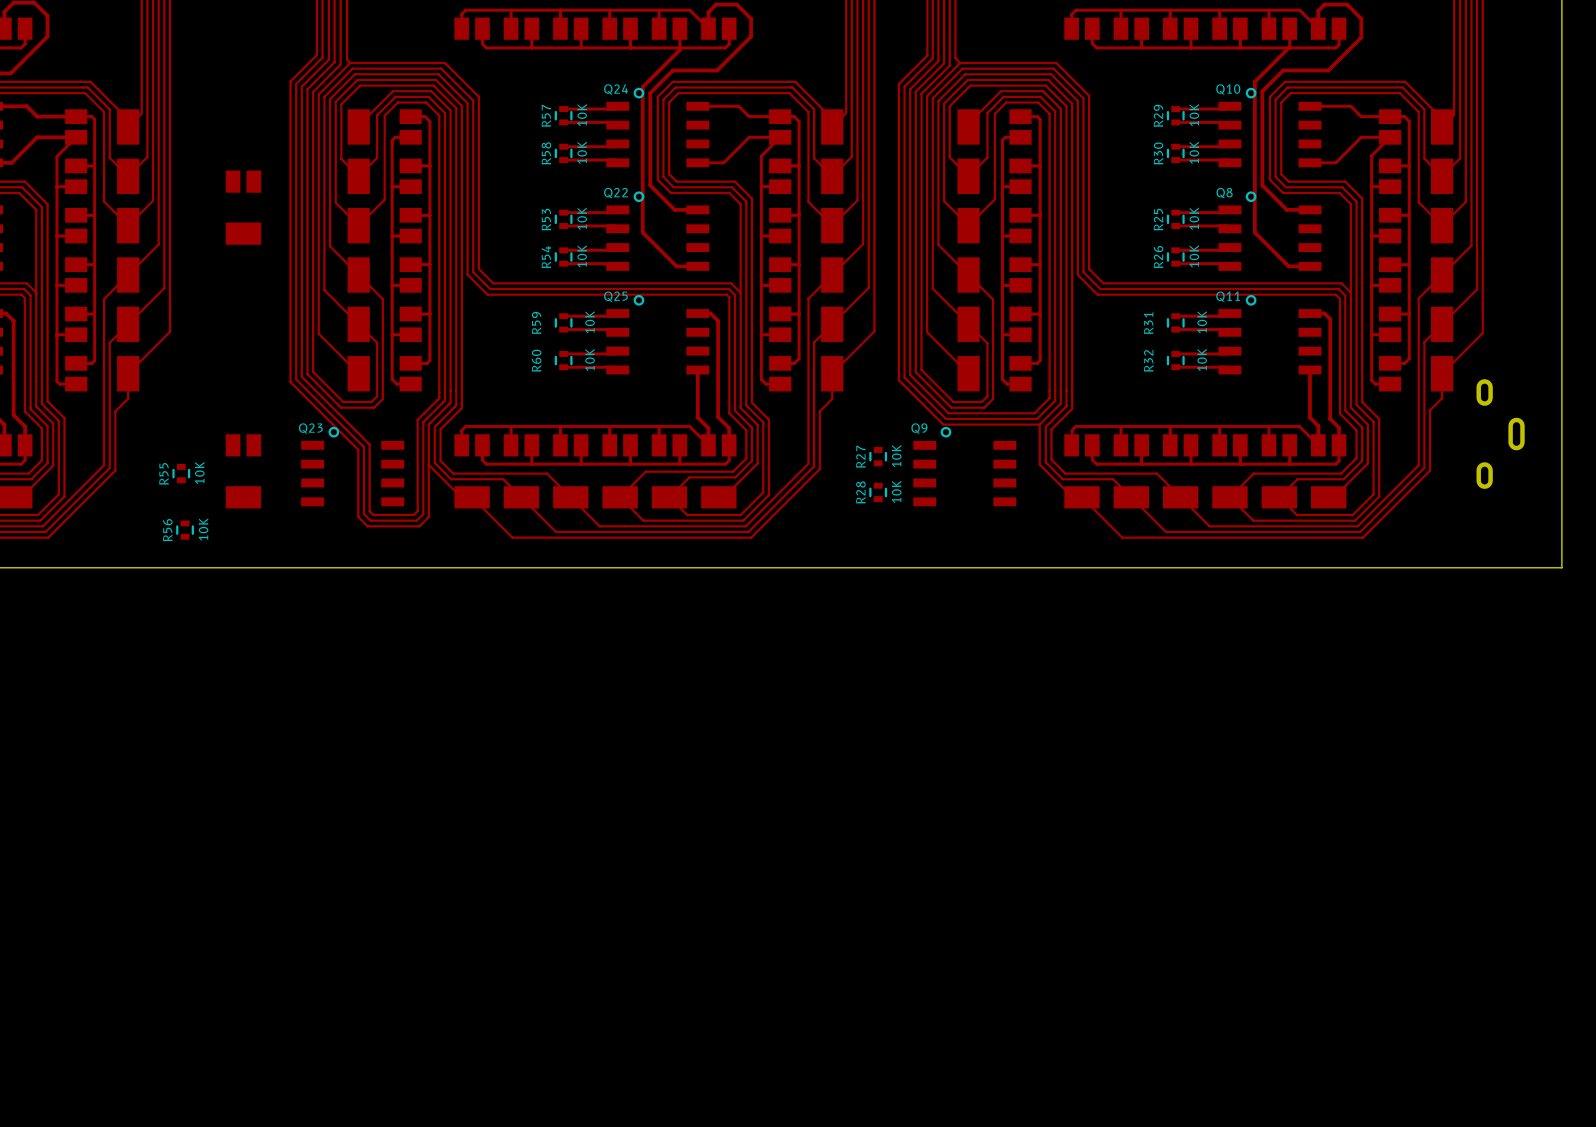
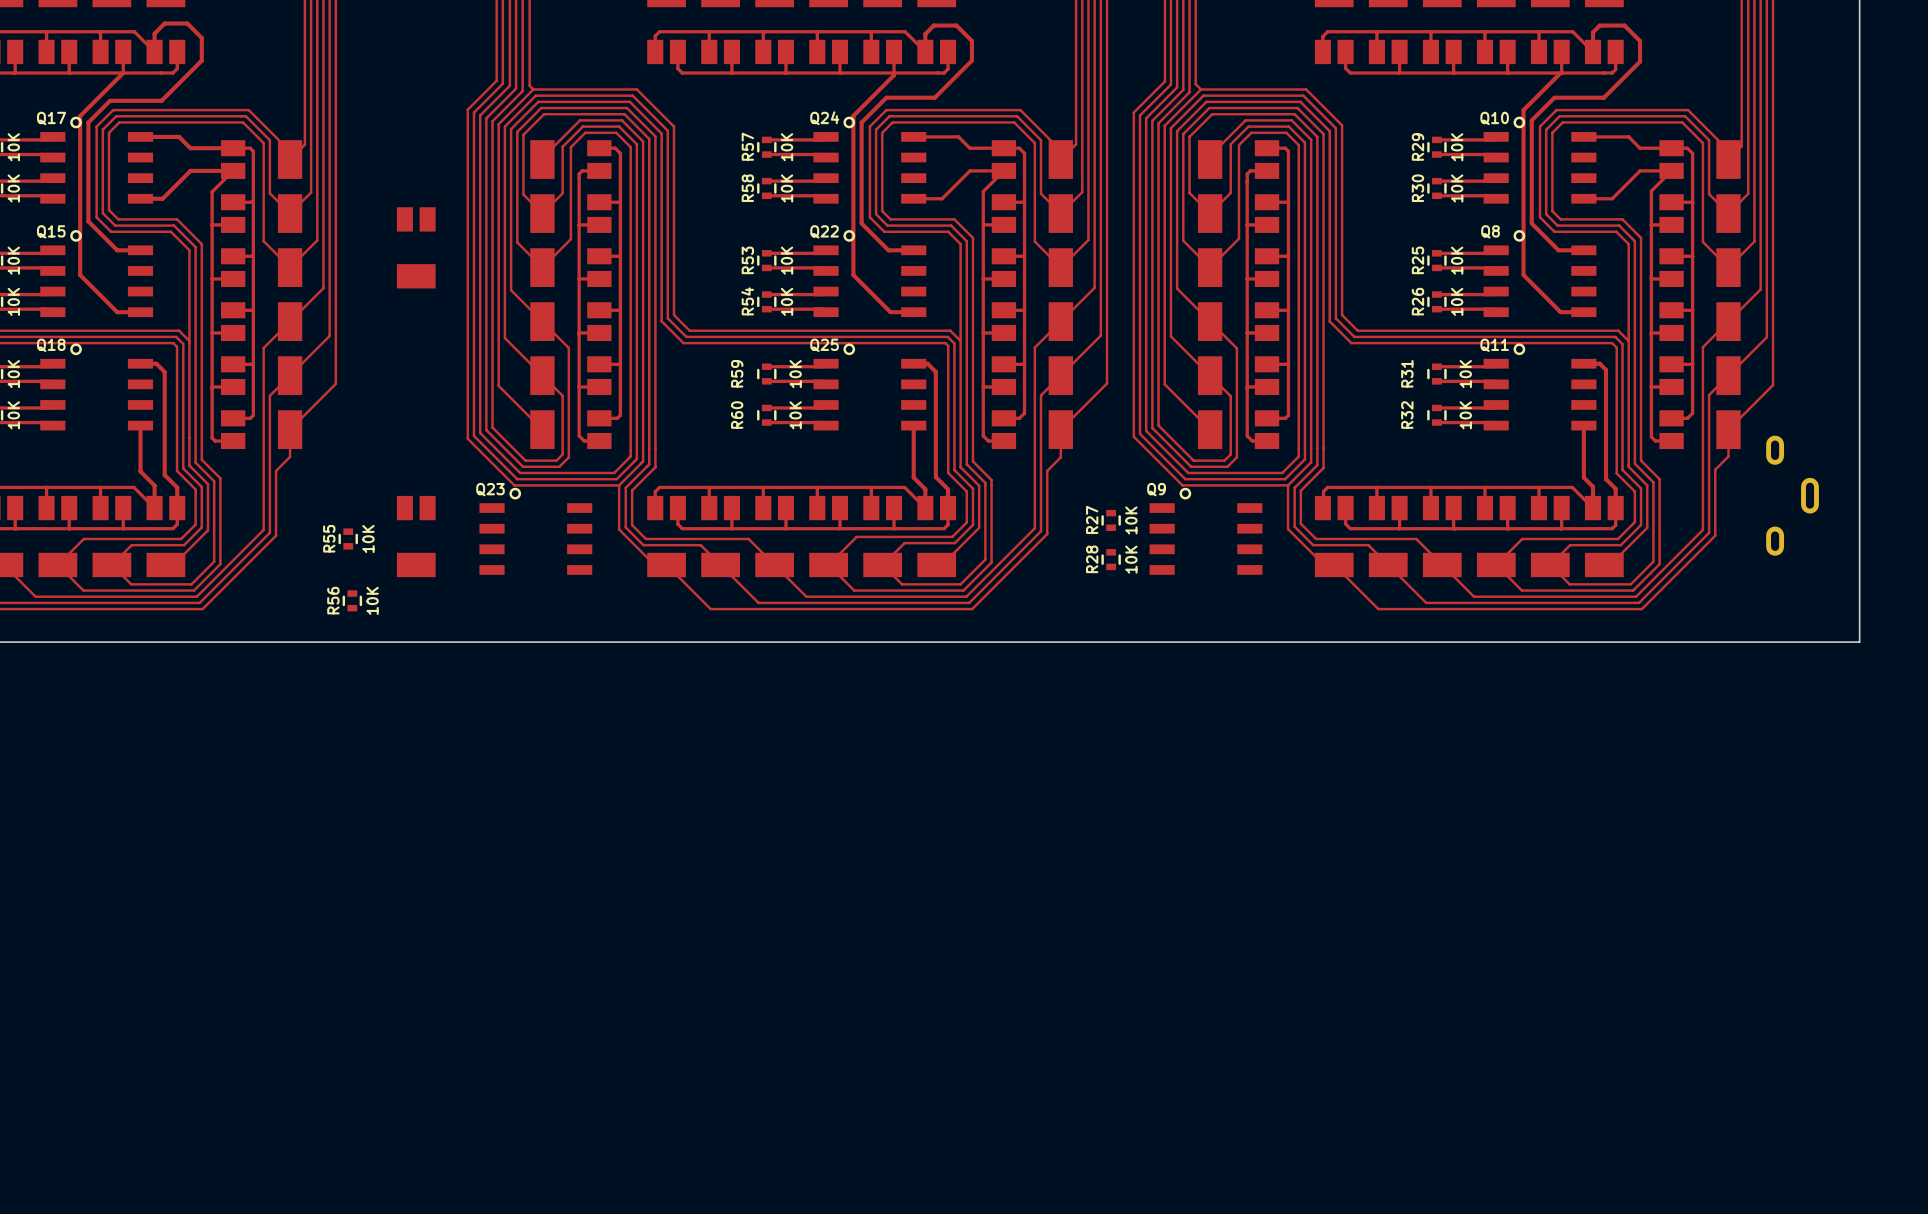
track: (338, 413) (369, 444) (369, 511) (373, 515) (413, 515) (417, 511) (417, 419) (424, 413) -> (520, 473) (614, 473)
track: (335, 418) (363, 447) (363, 514) (370, 520) (416, 520) (423, 514) (423, 422) (426, 418) -> (517, 479) (616, 479)
track: (333, 424) (358, 449) (358, 516) (367, 526) (419, 526) (428, 517) (428, 464) -> (514, 485) (619, 485)

